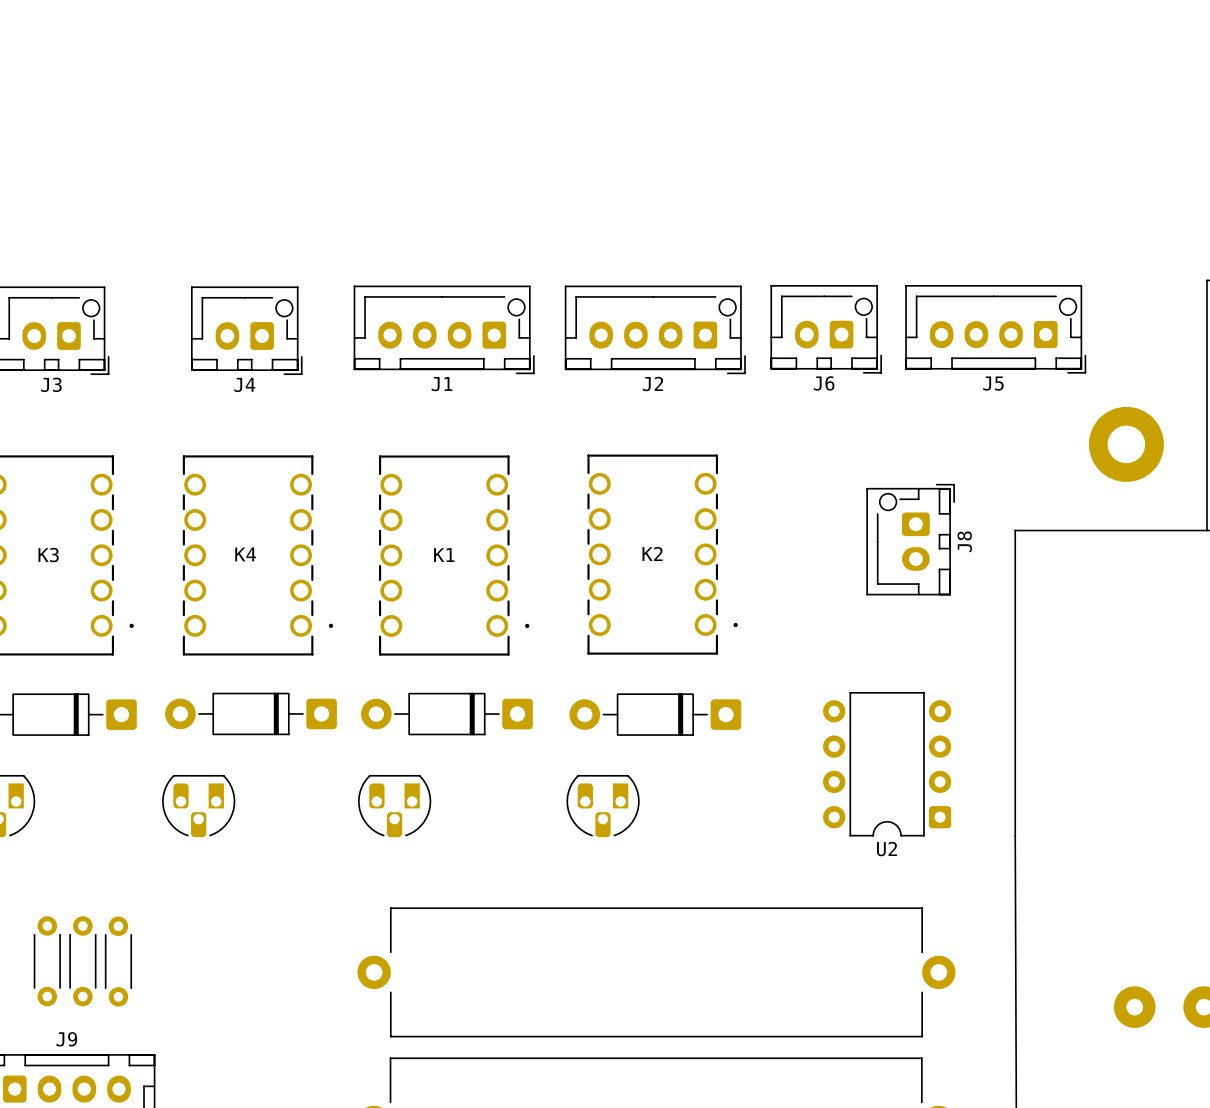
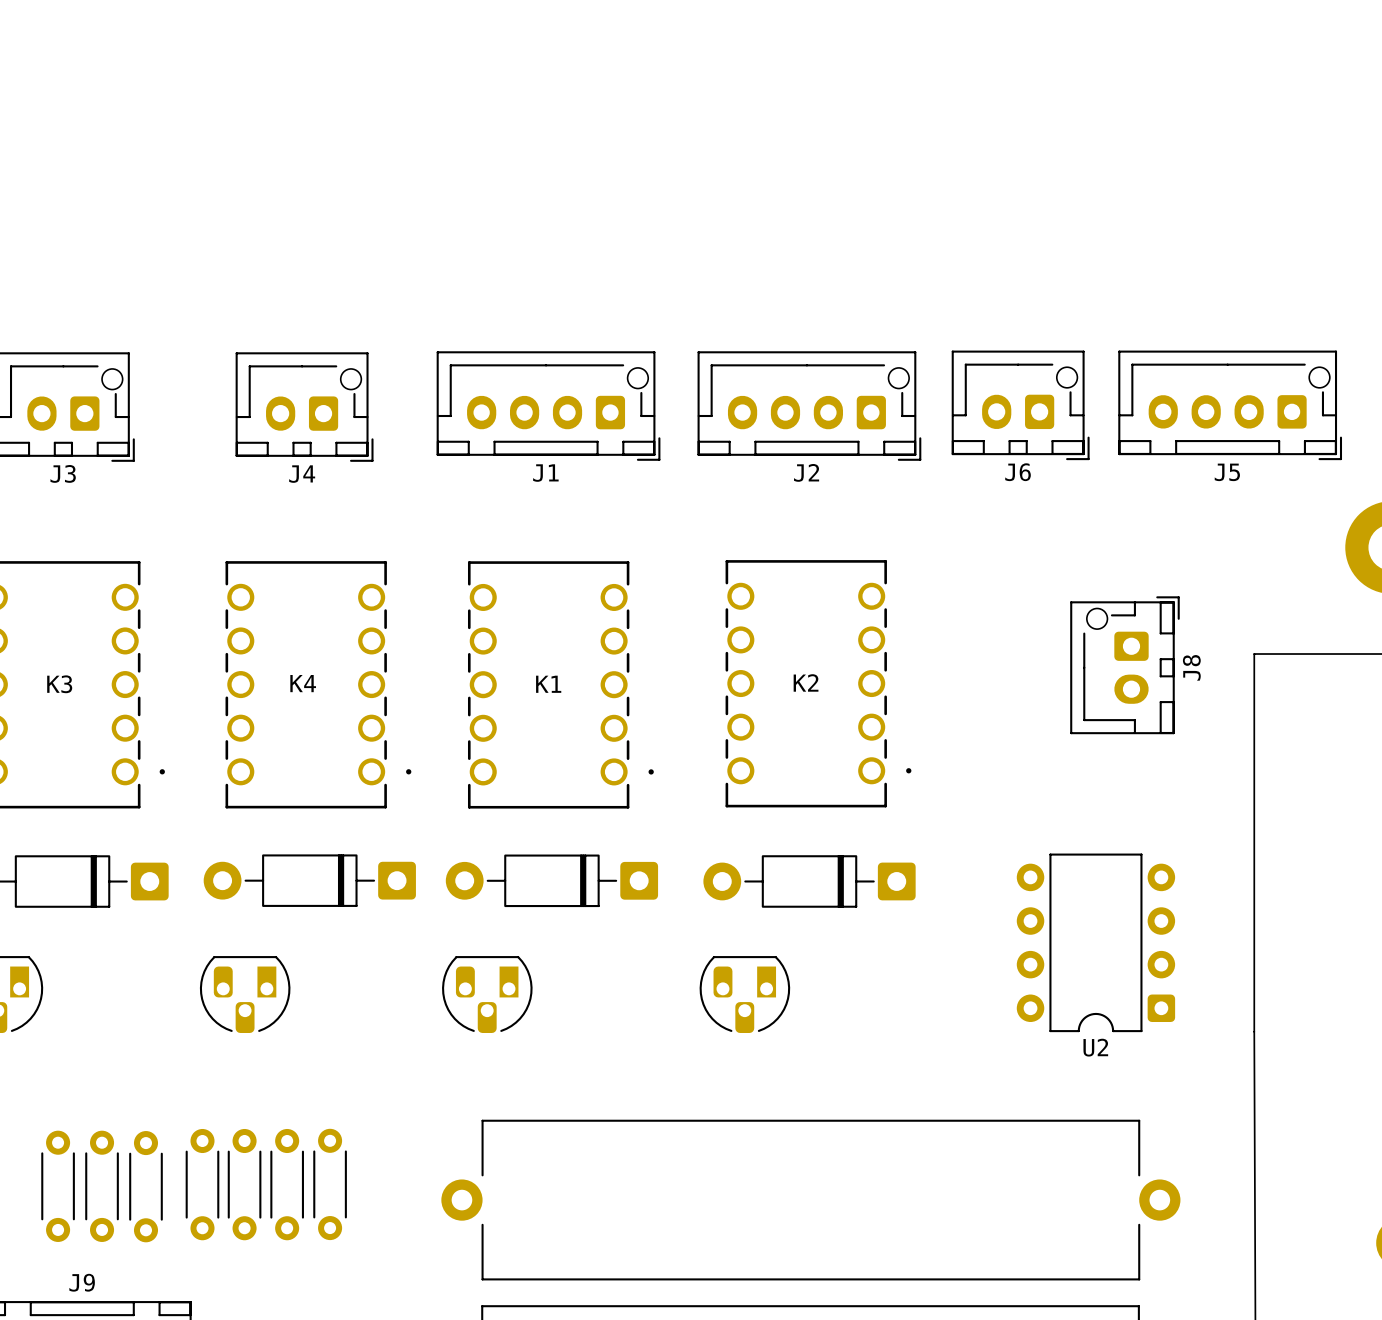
part: none -> (202, 1184)
part: none -> (244, 1184)
part: none -> (287, 1184)
part: none -> (330, 1184)

